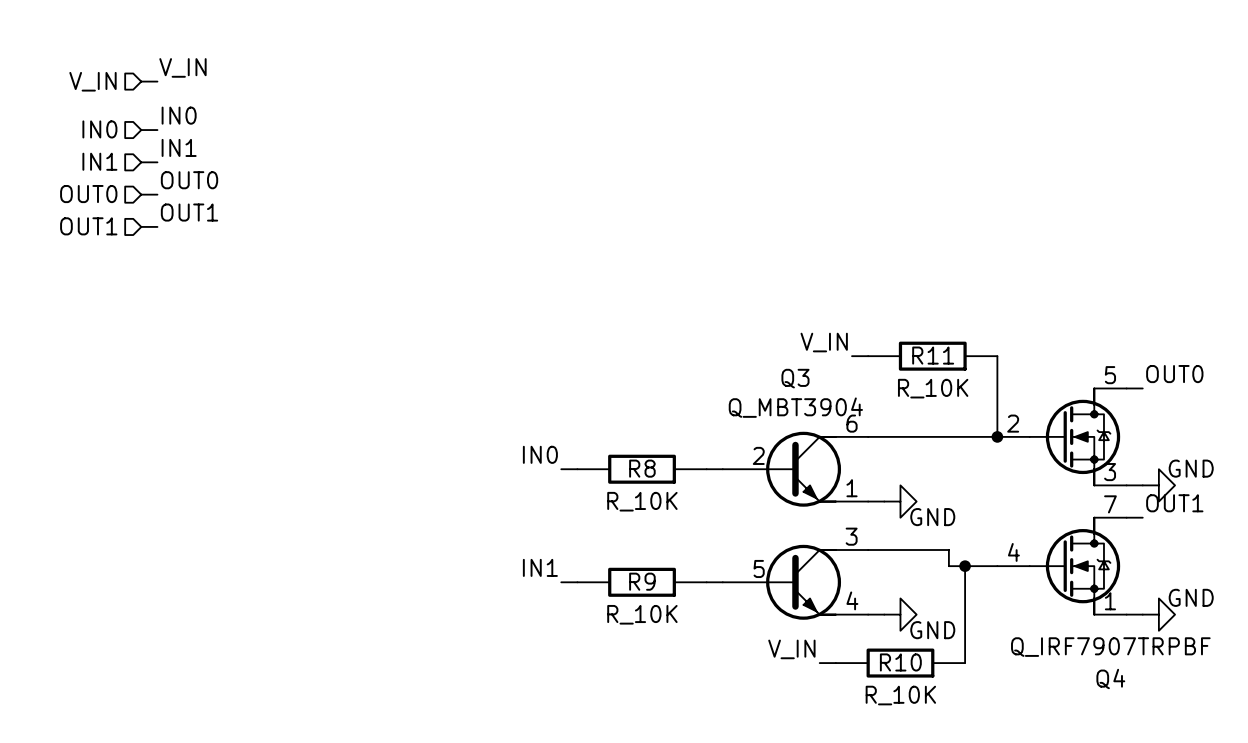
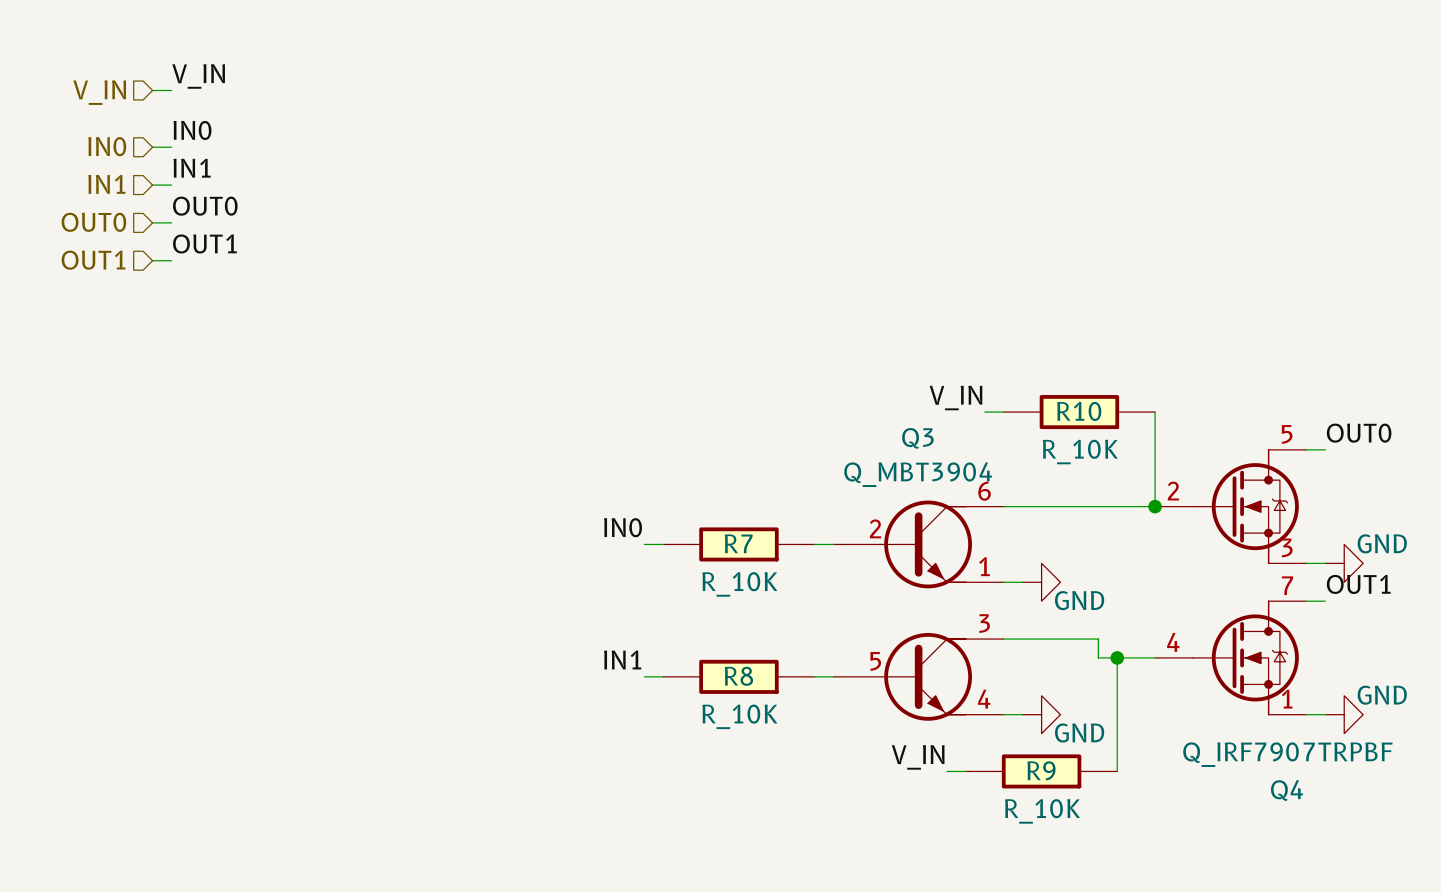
R11 name: R11 (933, 355) -> R10 (1079, 411)
R8 name: R8 (642, 468) -> R7 (738, 543)
R9 name: R9 (642, 581) -> R8 (738, 676)
R10 name: R10 (900, 662) -> R9 (1041, 770)

